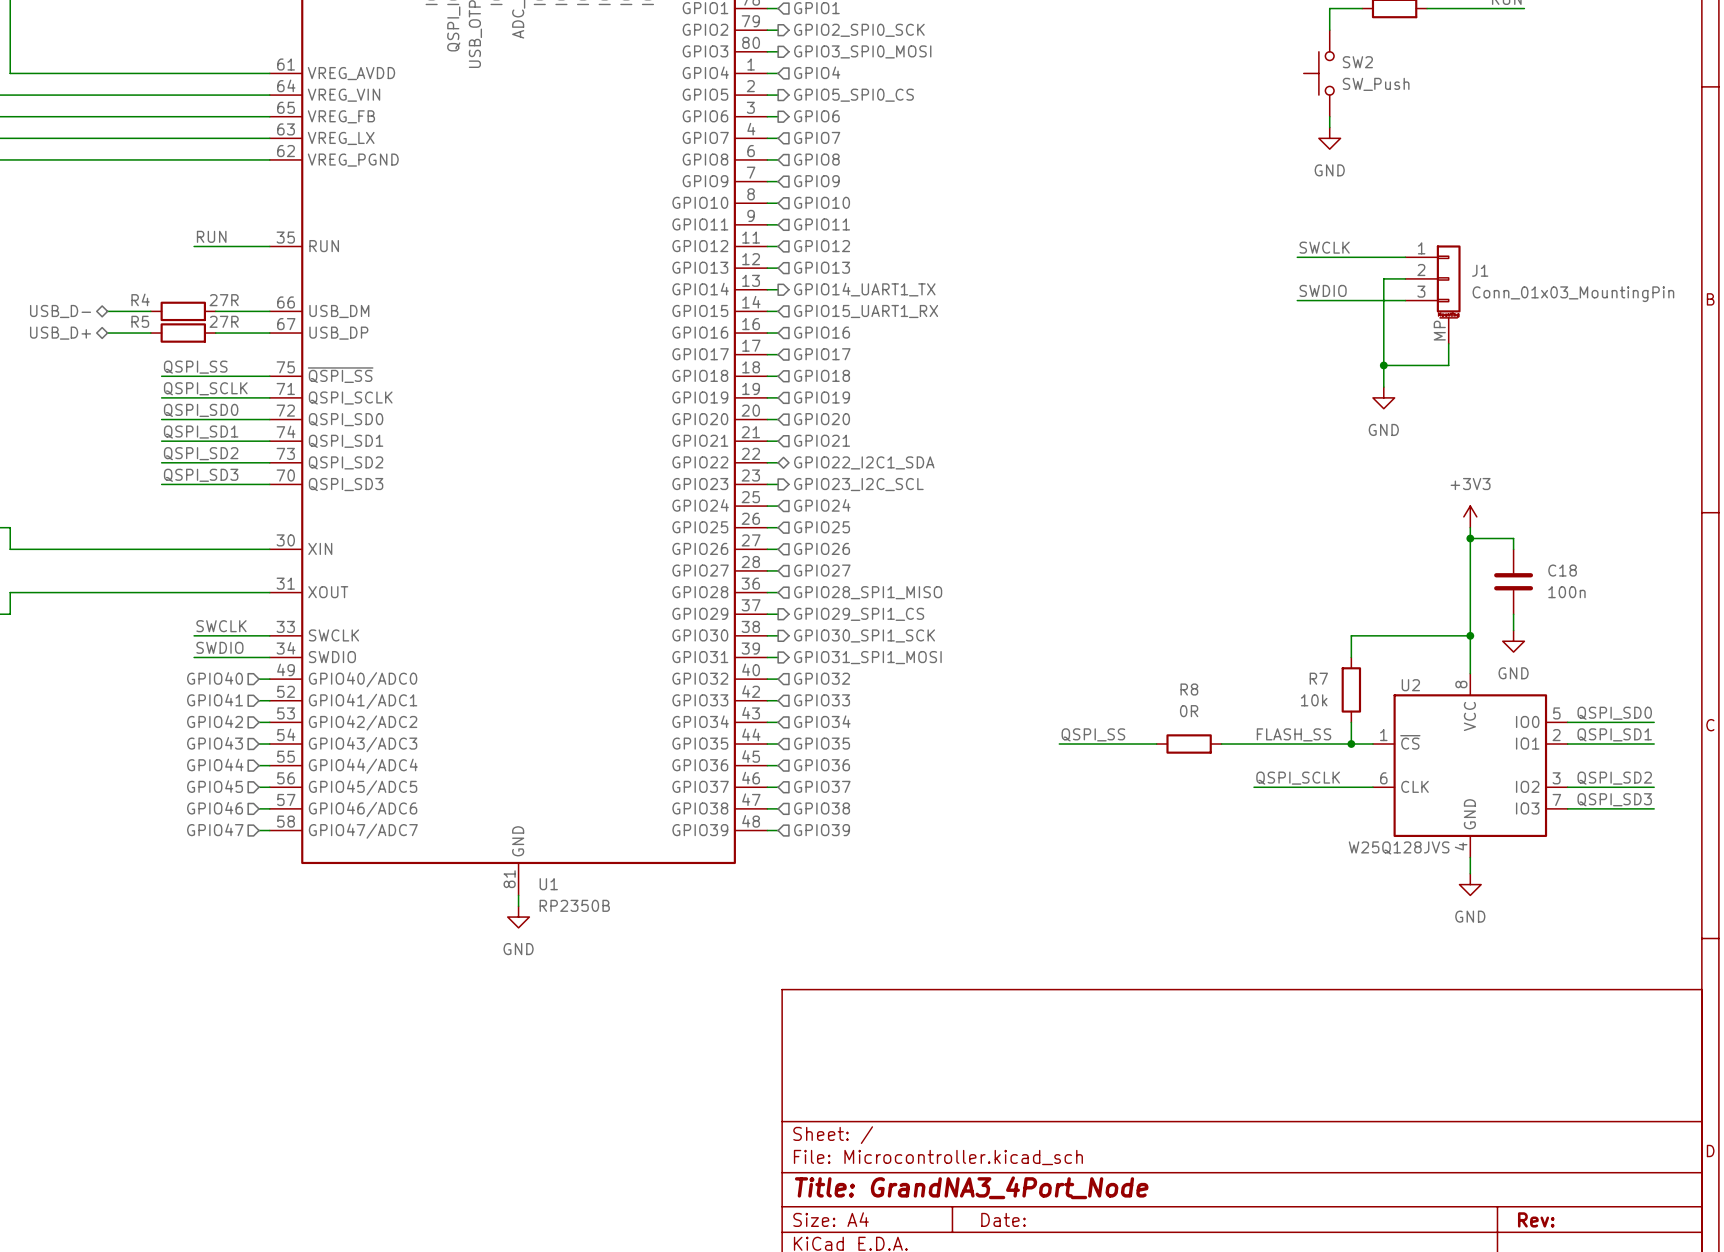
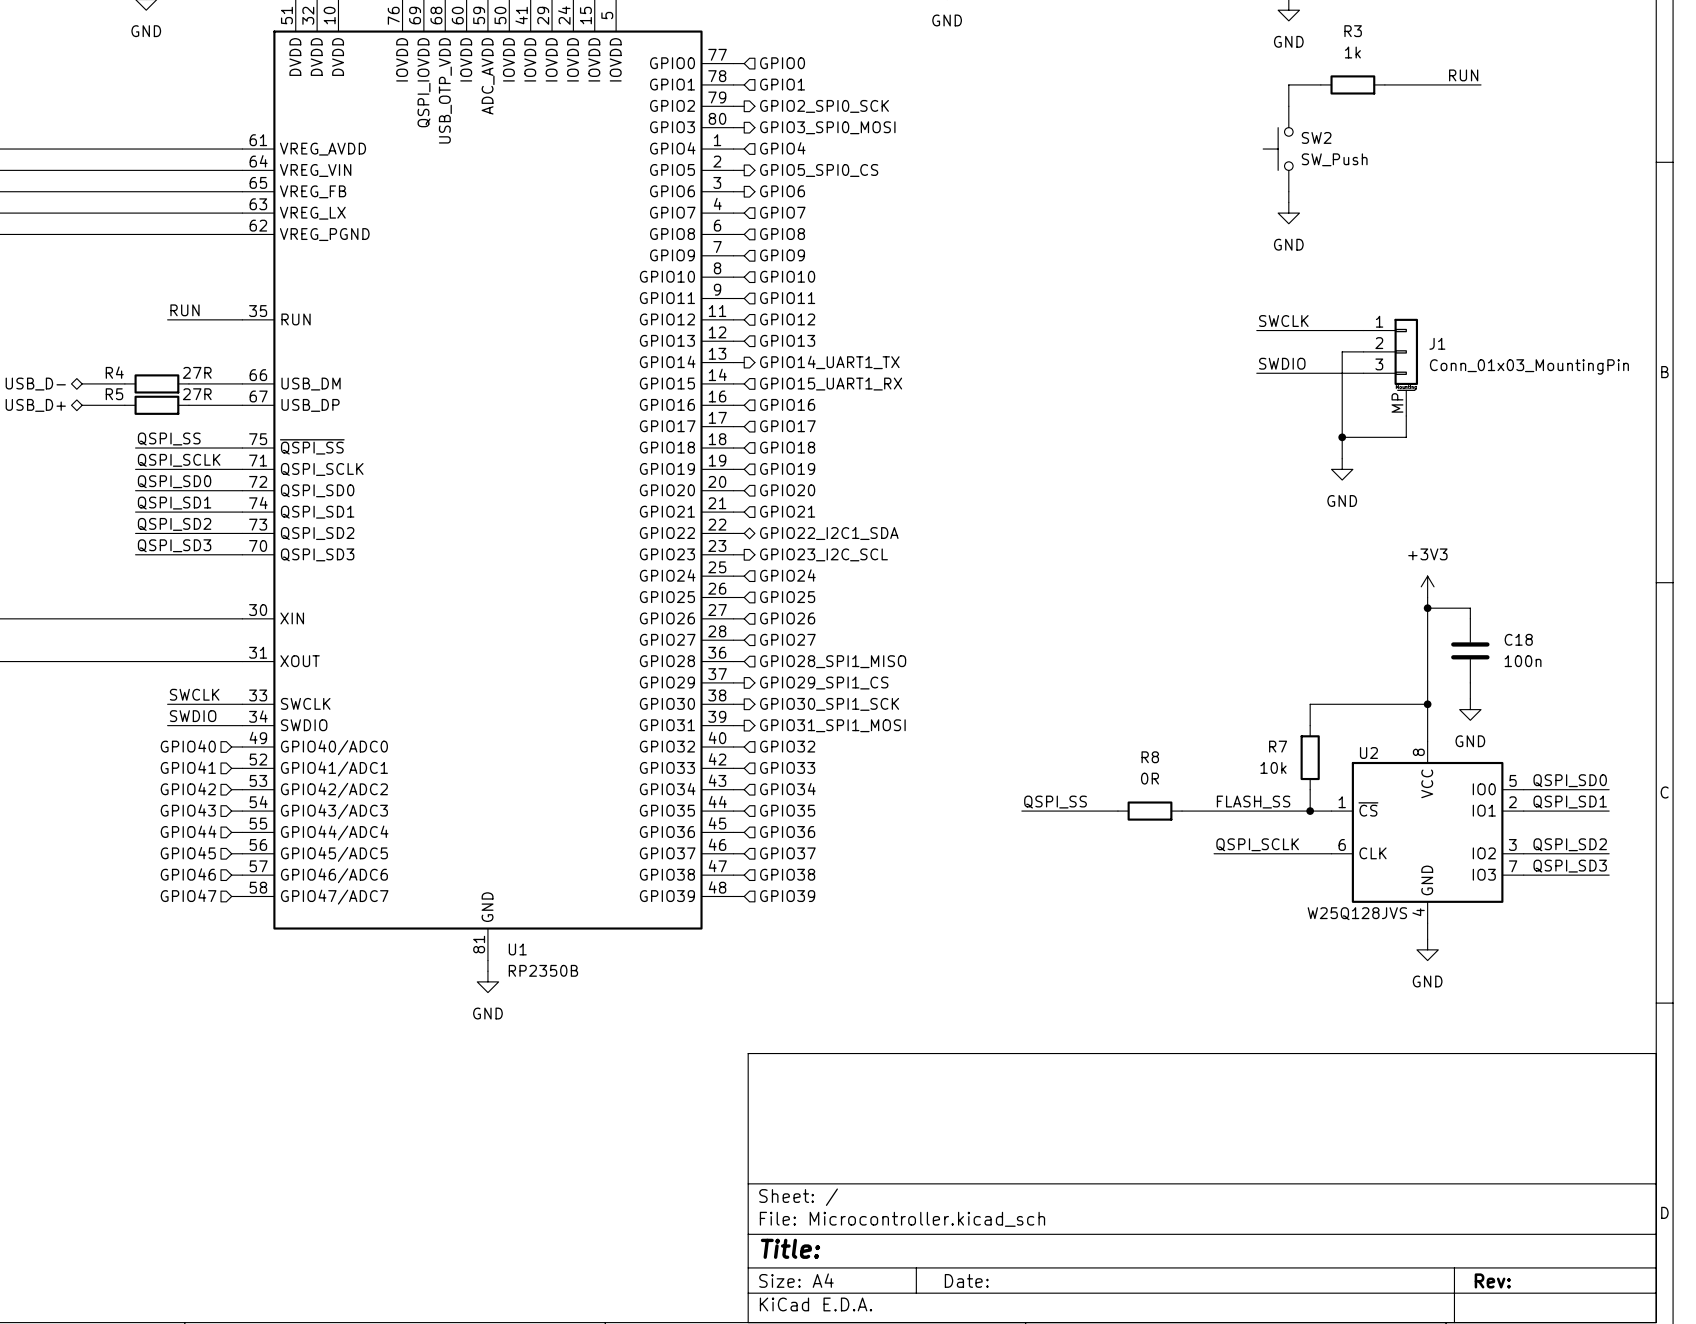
title block: Title: GrandNA3_4Port_Node (971, 1187) -> Title: (790, 1248)

